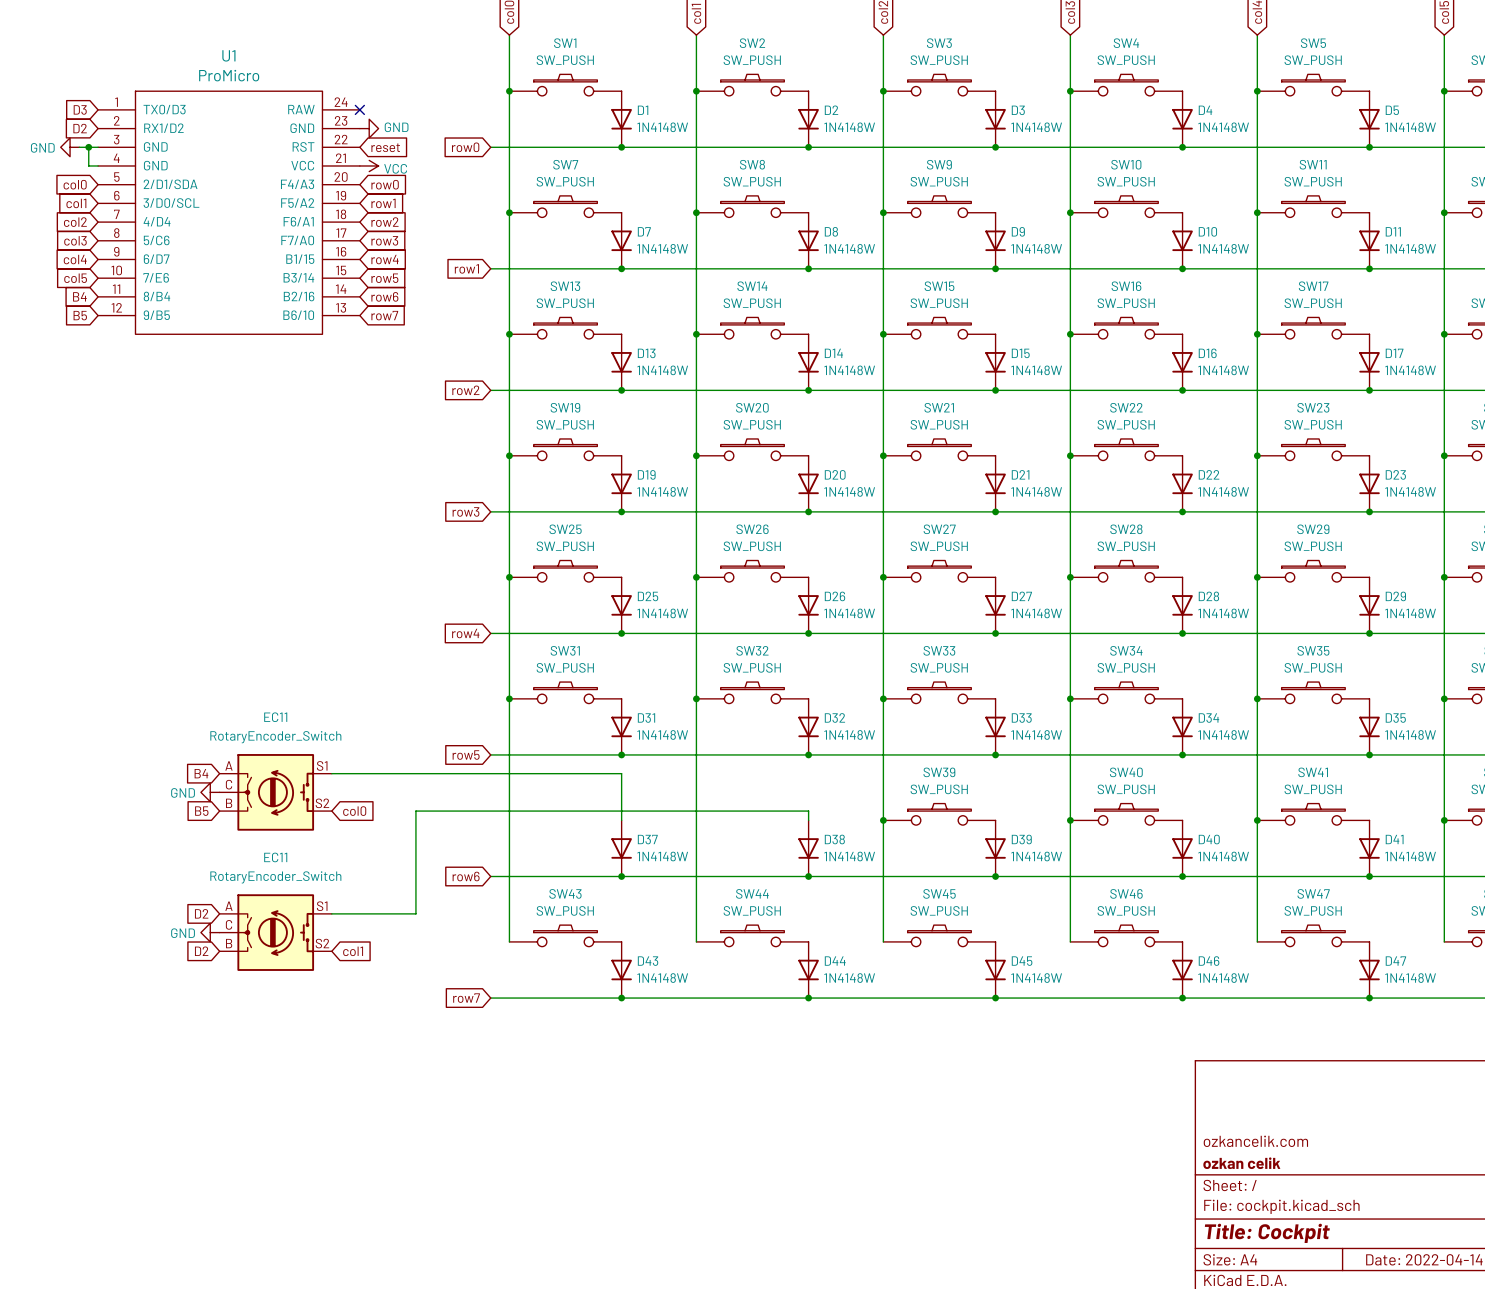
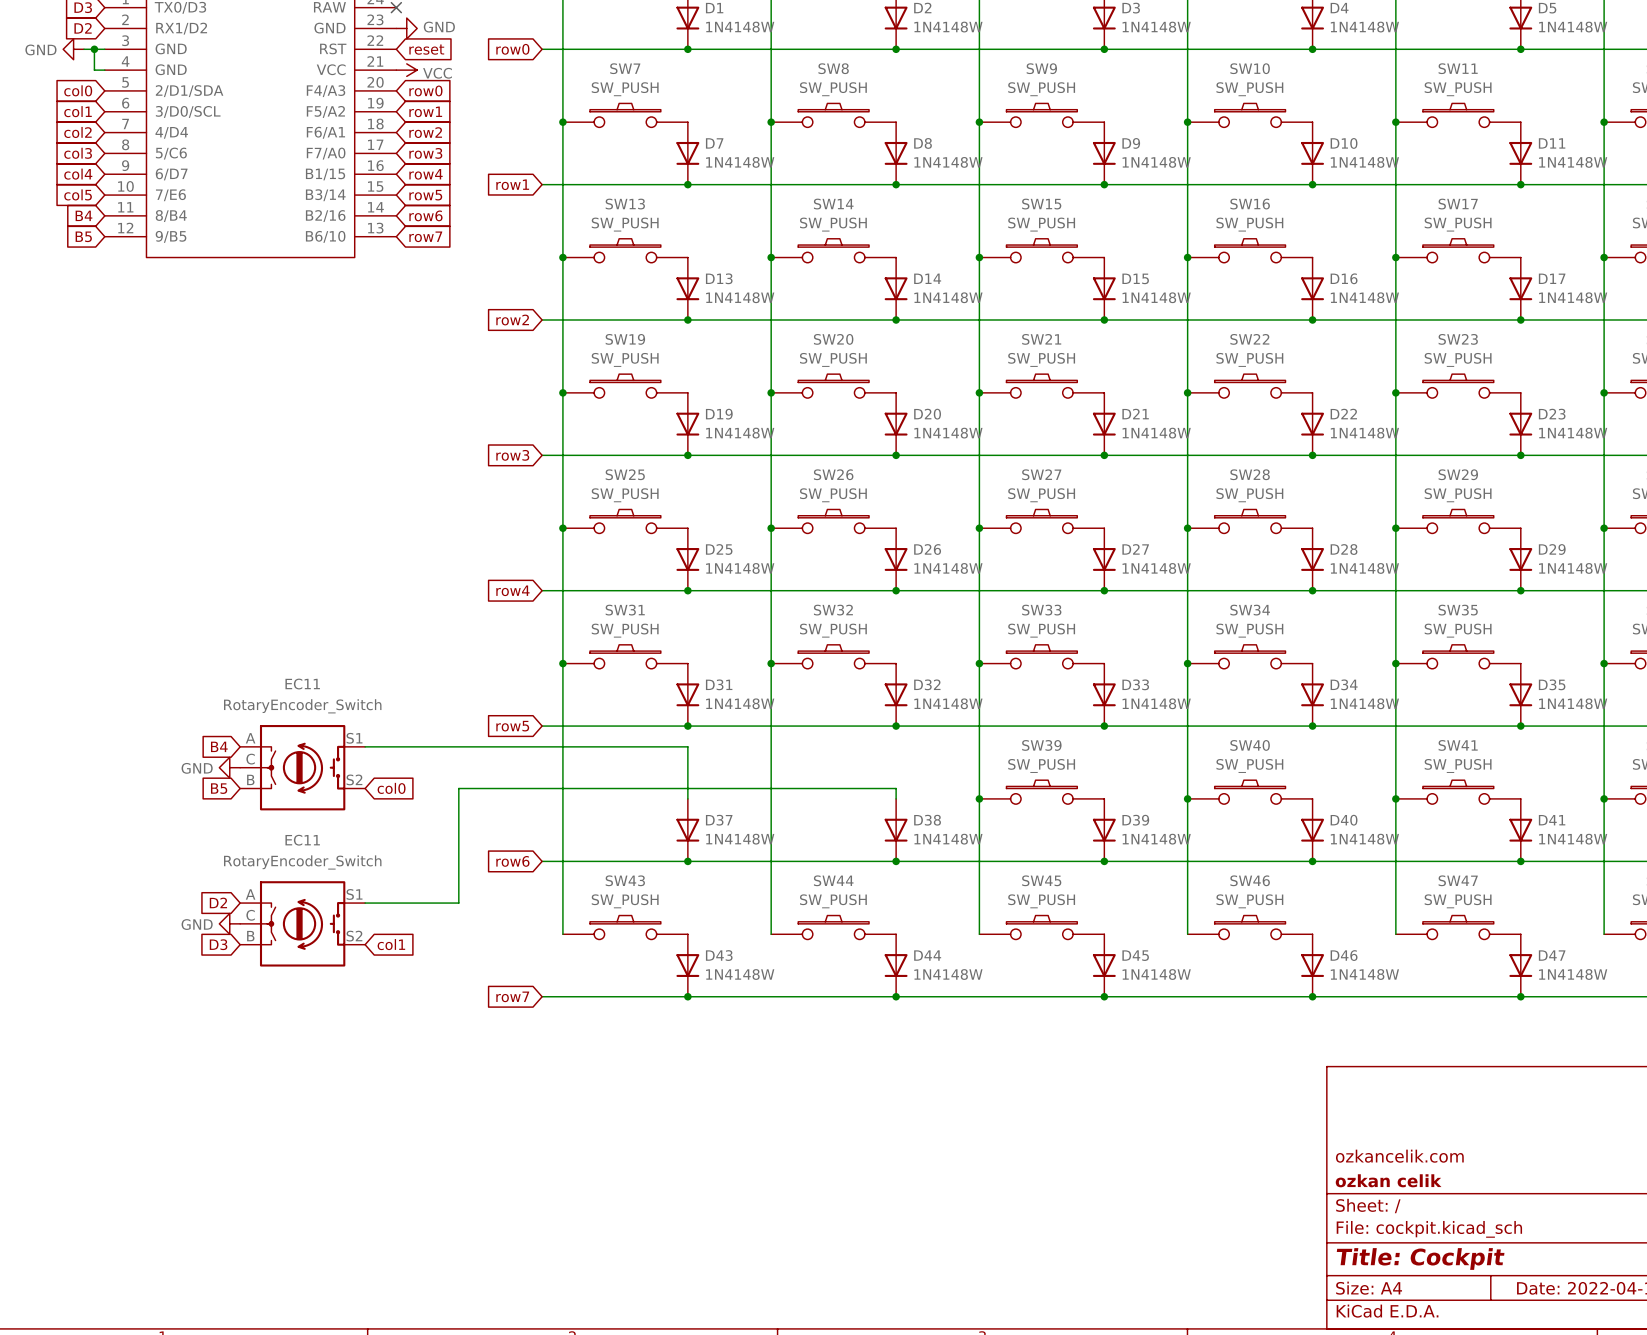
global label: D2 (201, 951) -> D3 (218, 944)

